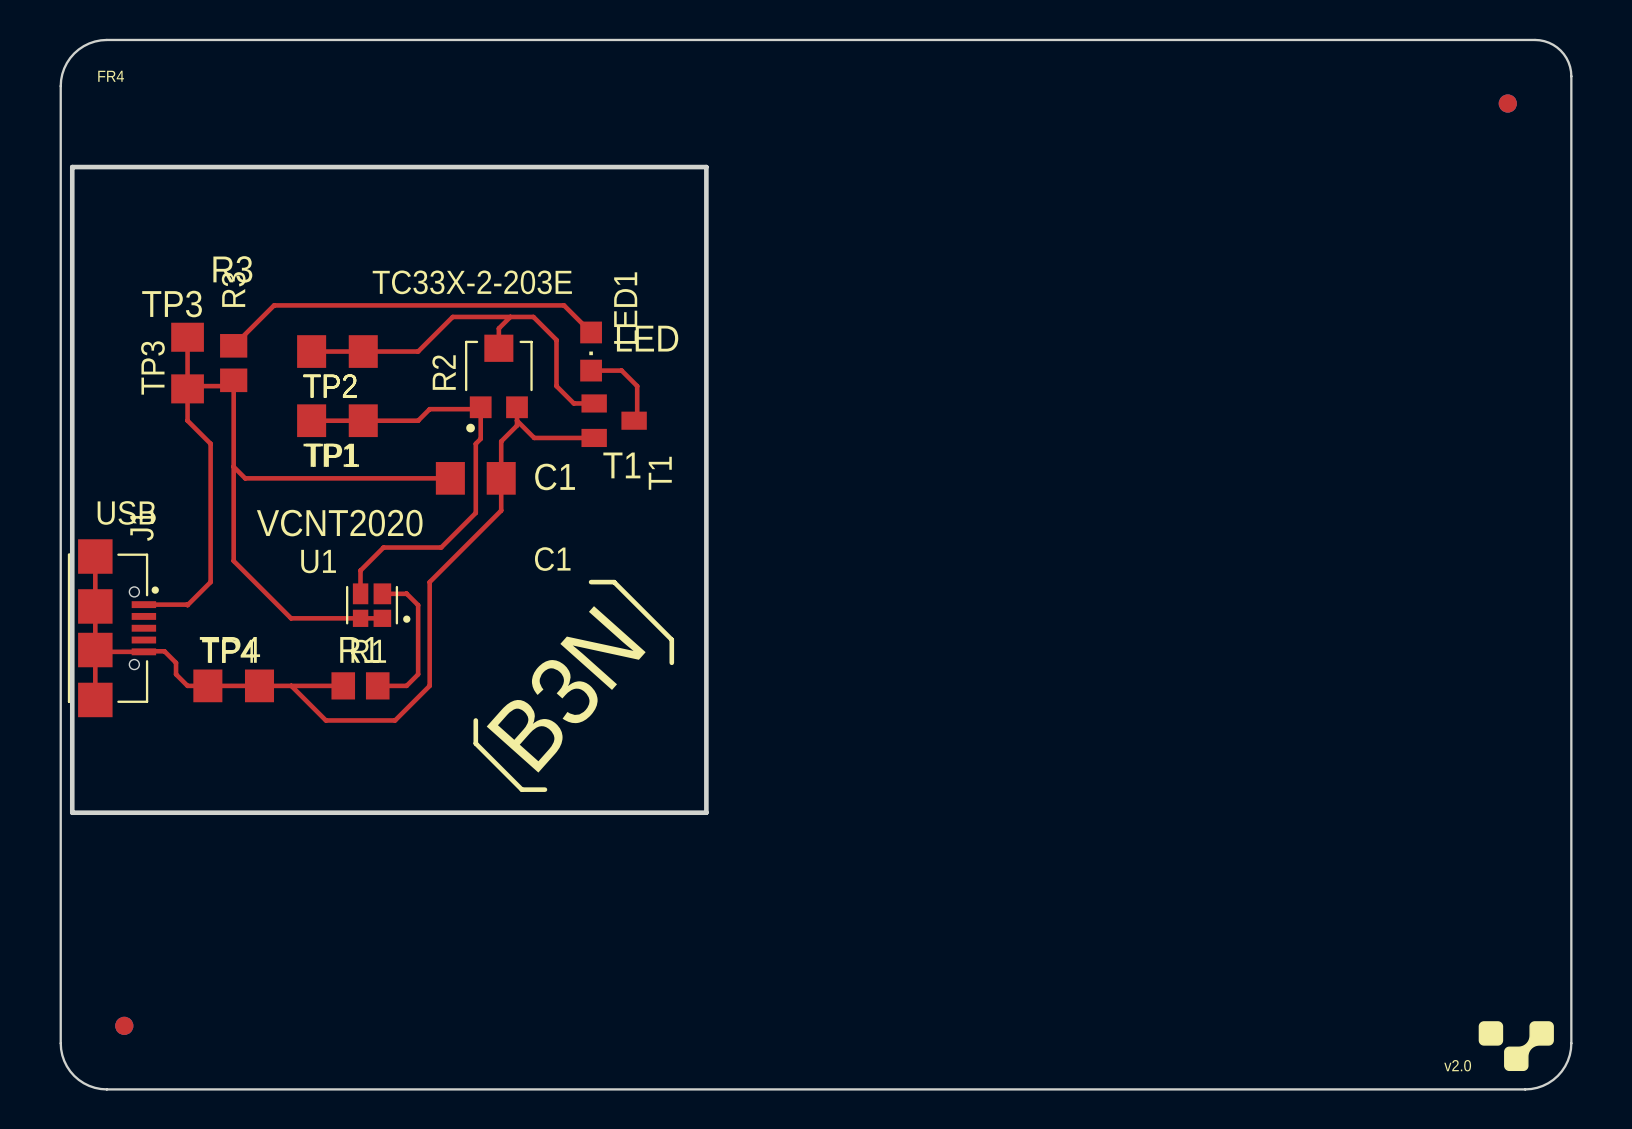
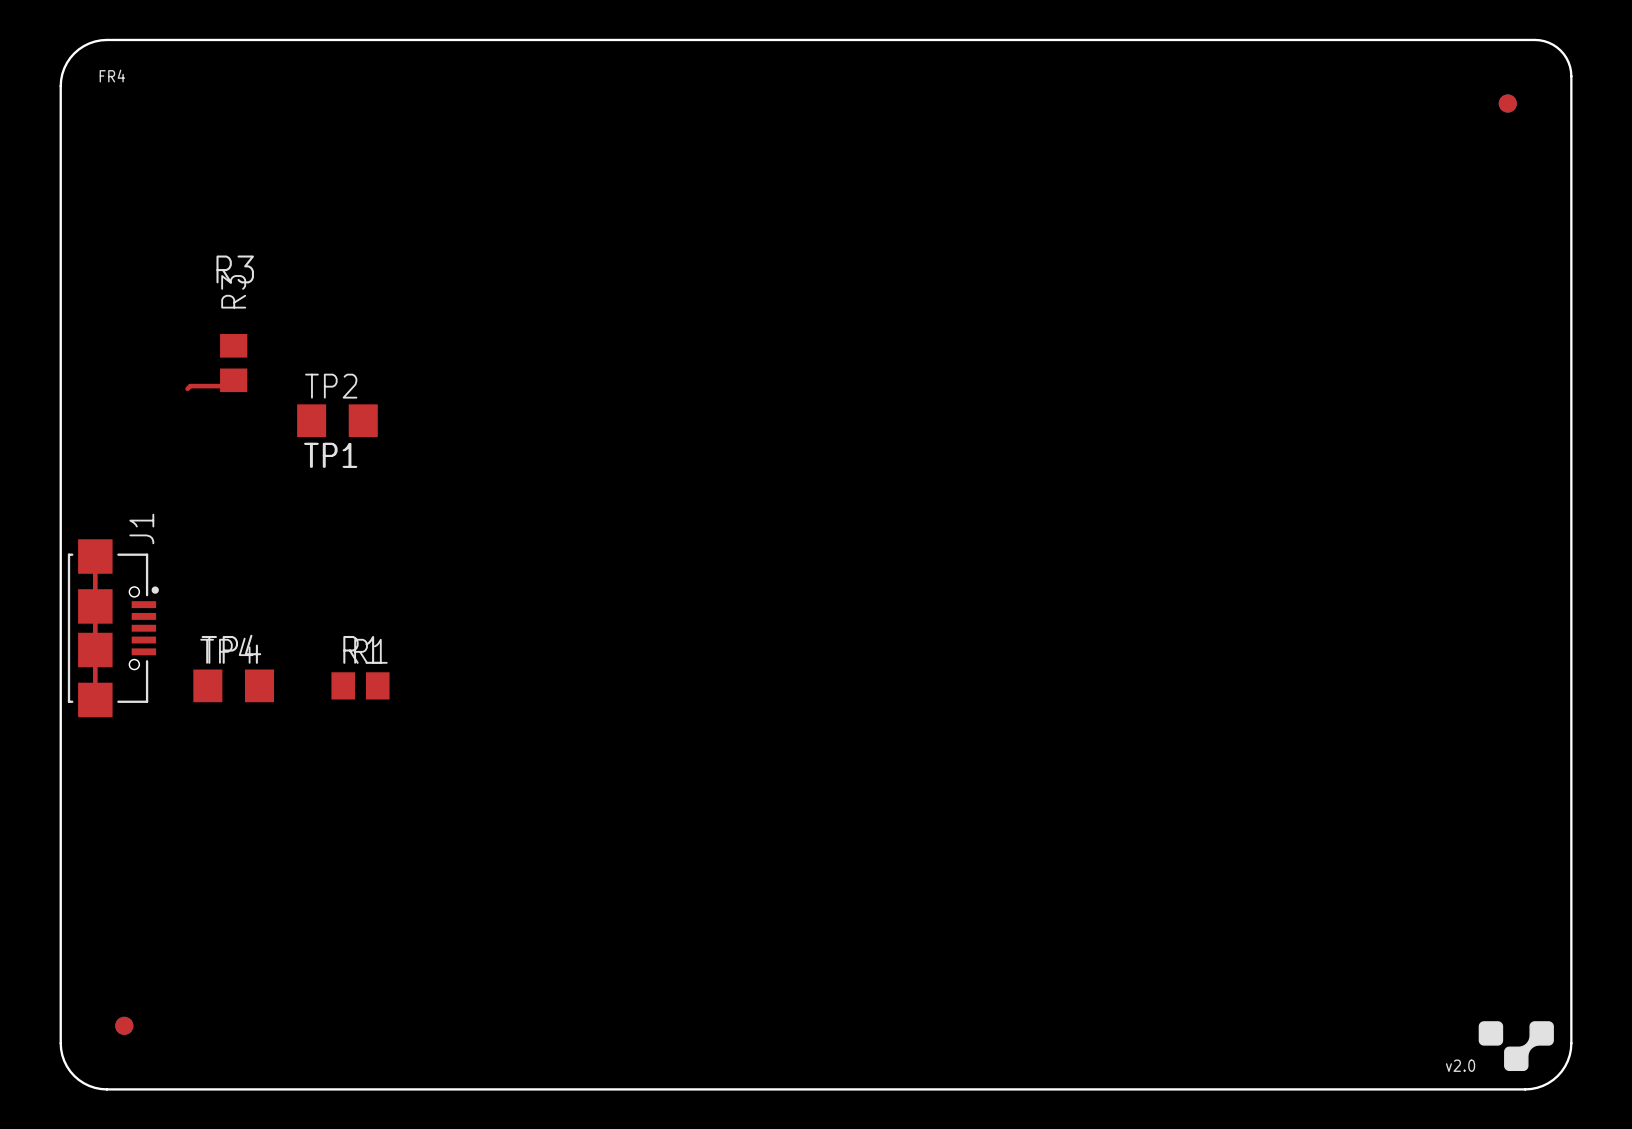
board edge: (72, 167) (706, 167) (706, 812) (72, 812) (72, 167) -> none
text: TC33X-2-203E (472, 282) -> none
text: TP3 (172, 304) -> none
top track: (510, 316) (498, 328) (498, 348) -> none
top track: (591, 332) (564, 305) (274, 305) (233, 345) -> none
top track: (187, 337) (187, 420) (210, 443) (210, 582) (187, 605) (143, 604) -> none
text: LED (647, 338) -> none
top track: (311, 351) (418, 351) (452, 316) (533, 316) (556, 340) (556, 386) (573, 403) (594, 403) -> none
part: (337, 351) -> none
LED1: (591, 351) -> none
TP3: (187, 363) -> none
top track: (591, 370) (621, 370) (637, 386) (637, 420) (634, 420) -> none
top track: (233, 380) (233, 560) (291, 618) (382, 618) -> none
R2: (498, 383) -> none
top track: (480, 407) (480, 438) (475, 443) (475, 512) (441, 547) (383, 547) (360, 570) (360, 593) -> none
top track: (517, 407) (517, 425) (501, 441) (501, 510) (429, 582) (429, 685) (395, 720) (325, 720) (291, 685) -> none
top track: (480, 409) (429, 409) (418, 420) (311, 420) -> none
top track: (517, 420) (534, 437) (594, 437) -> none
T1: (614, 420) -> none
text: T1 (621, 465) -> none
top track: (233, 466) (245, 478) (450, 478) -> none
text: C1 (555, 476) -> none
C1: (475, 478) -> none
text: USB (126, 512) -> none
text: VCNT2020 (339, 523) -> none
line: (591, 582) (614, 582) (671, 639) (671, 662) -> none
top track: (382, 593) (406, 593) -> none
top track: (406, 593) (418, 605) (418, 674) (406, 685) (377, 685) -> none
U1: (378, 605) -> none
top track: (97, 651) (164, 651) (176, 662) (176, 674) (187, 685) (343, 685) -> none
text: B3N (566, 689) -> none
line: (475, 720) (475, 743) (521, 789) (544, 789) -> none

